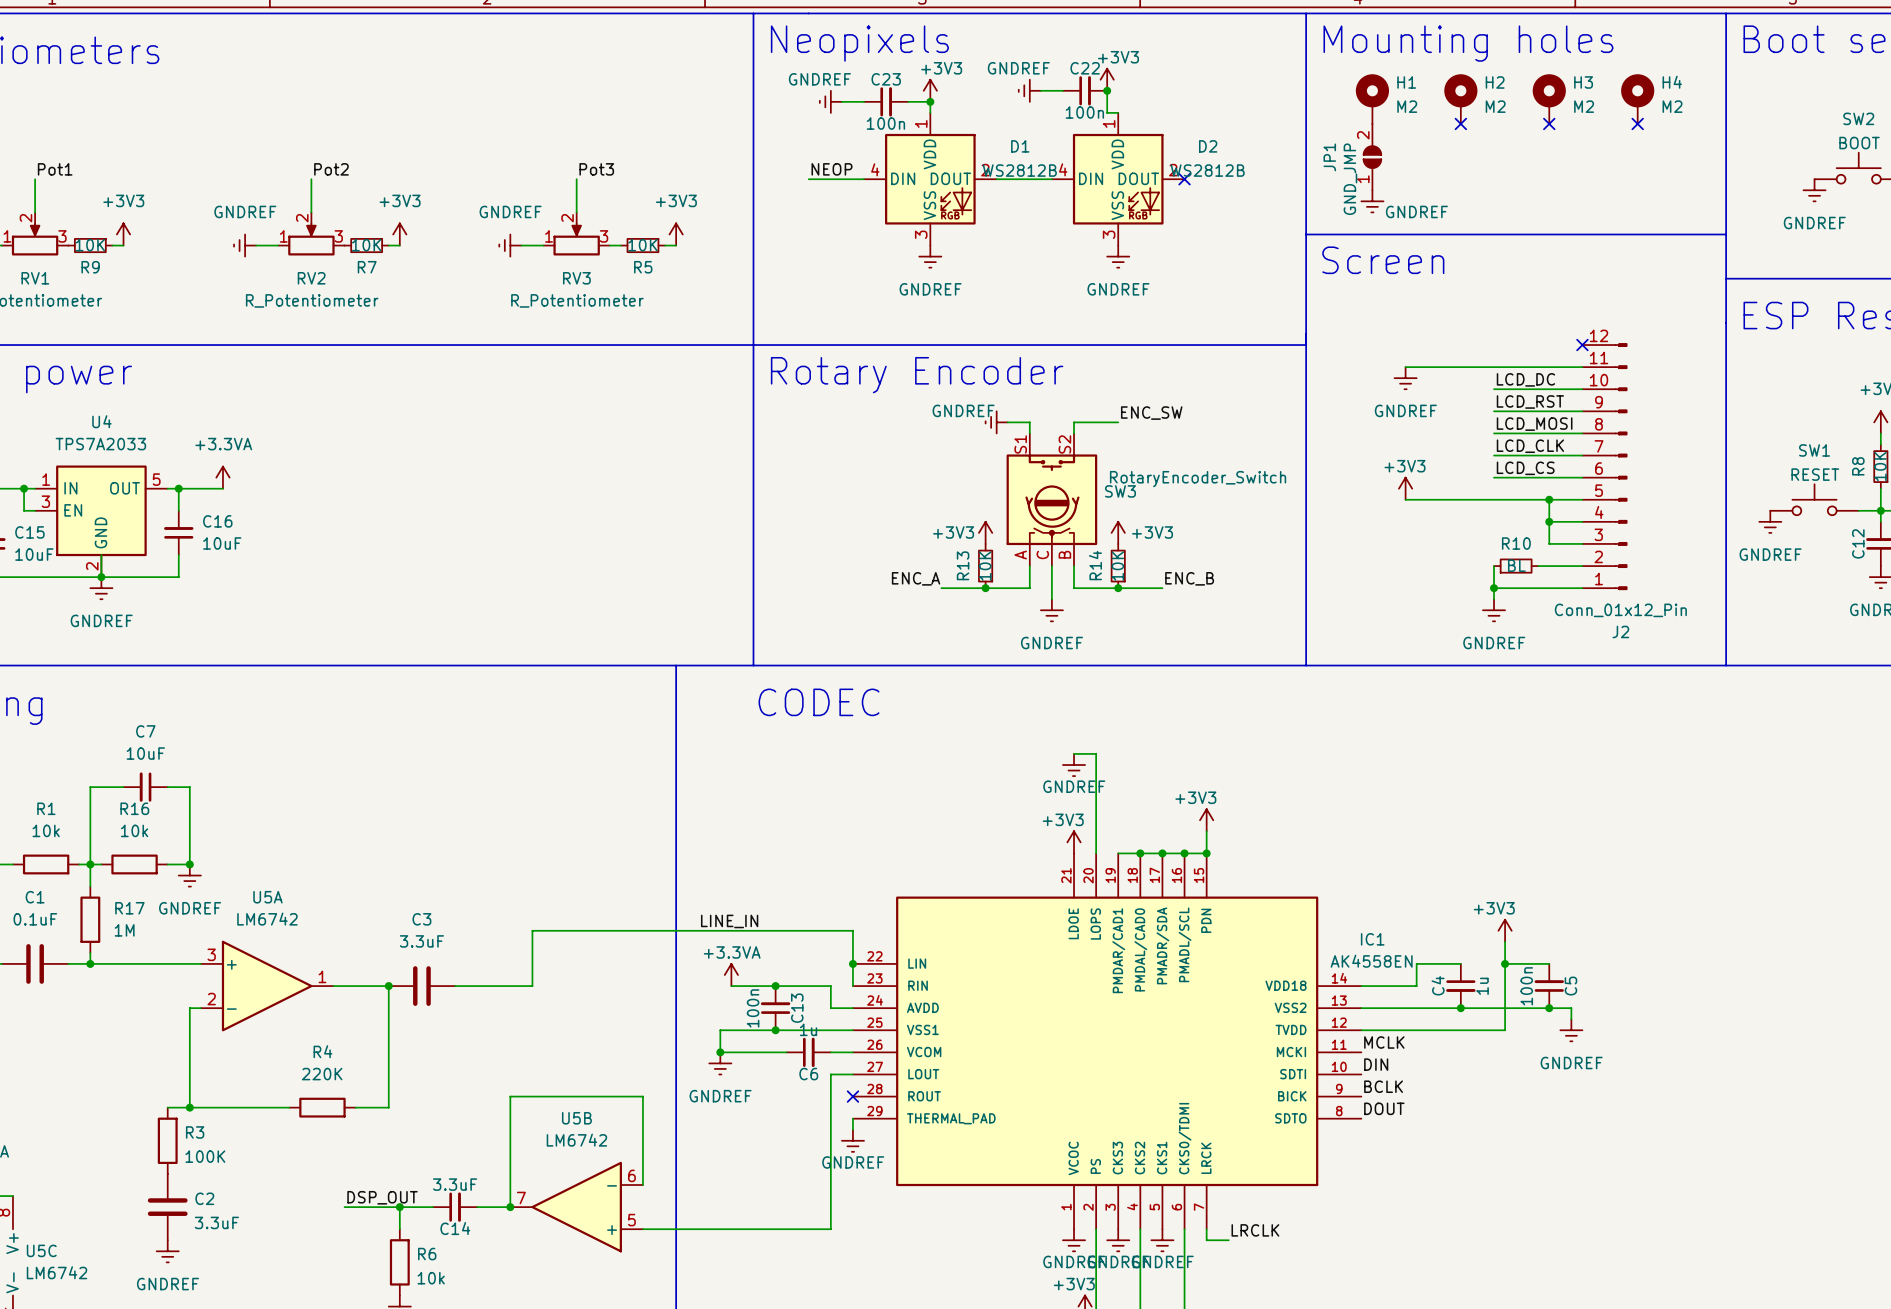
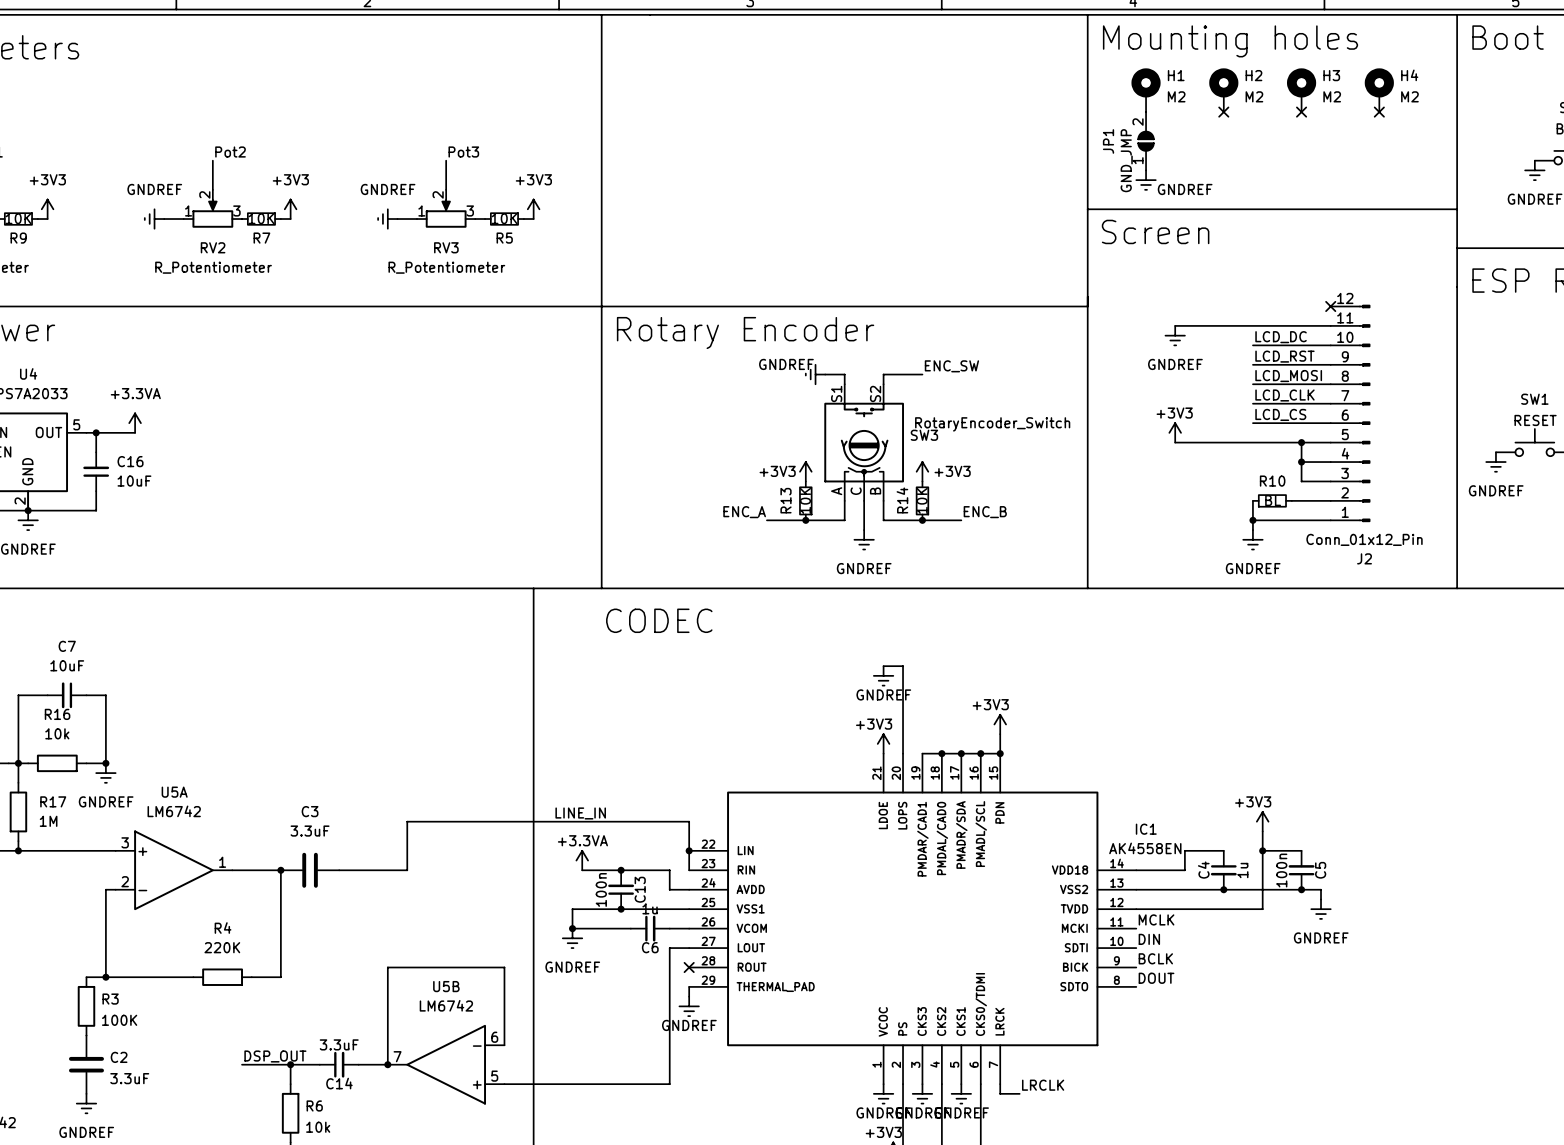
text: Neopixels (859, 43) -> none
power symbol: +3V3 (1107, 79) -> none
power symbol: +3V3 (930, 90) -> none
power symbol: GNDREF (1029, 90) -> none
wire: (1040, 90) (1062, 90) -> none
C22: 100n (1085, 90) -> none
wire: (1107, 90) (1107, 112) (1118, 112) -> none
junction: (1107, 90) -> none
power symbol: GNDREF (830, 101) -> none
wire: (841, 101) (864, 101) -> none
C23: 100n (886, 101) -> none
wire: (908, 101) (930, 101) (930, 112) -> none
junction: (930, 101) -> none
label: NEOP (832, 169) -> none
wire: (808, 179) (864, 179) -> none
D1: WS2812B (930, 179) -> none
wire: (996, 179) (1051, 179) -> none
D2: WS2812B (1118, 179) -> none
no-connect mark: (1184, 179) -> none
power symbol: GNDREF (930, 256) -> none
power symbol: GNDREF (1118, 256) -> none

